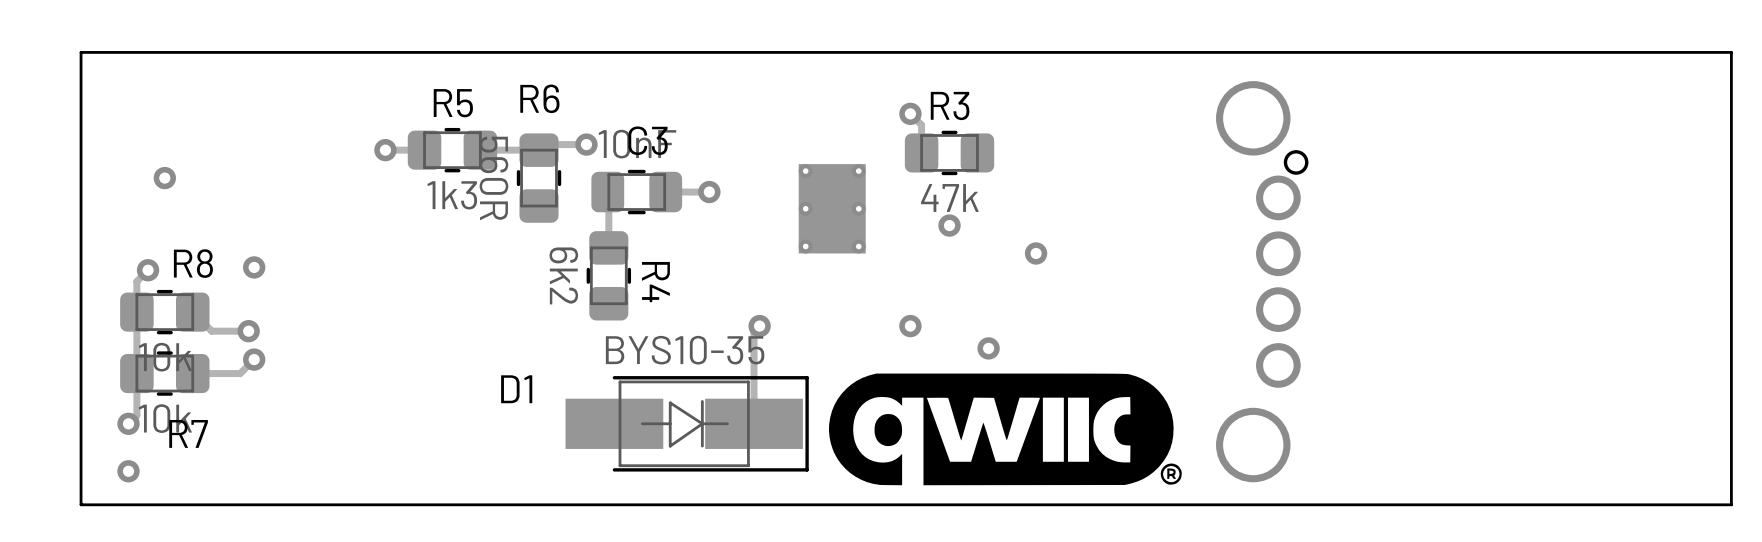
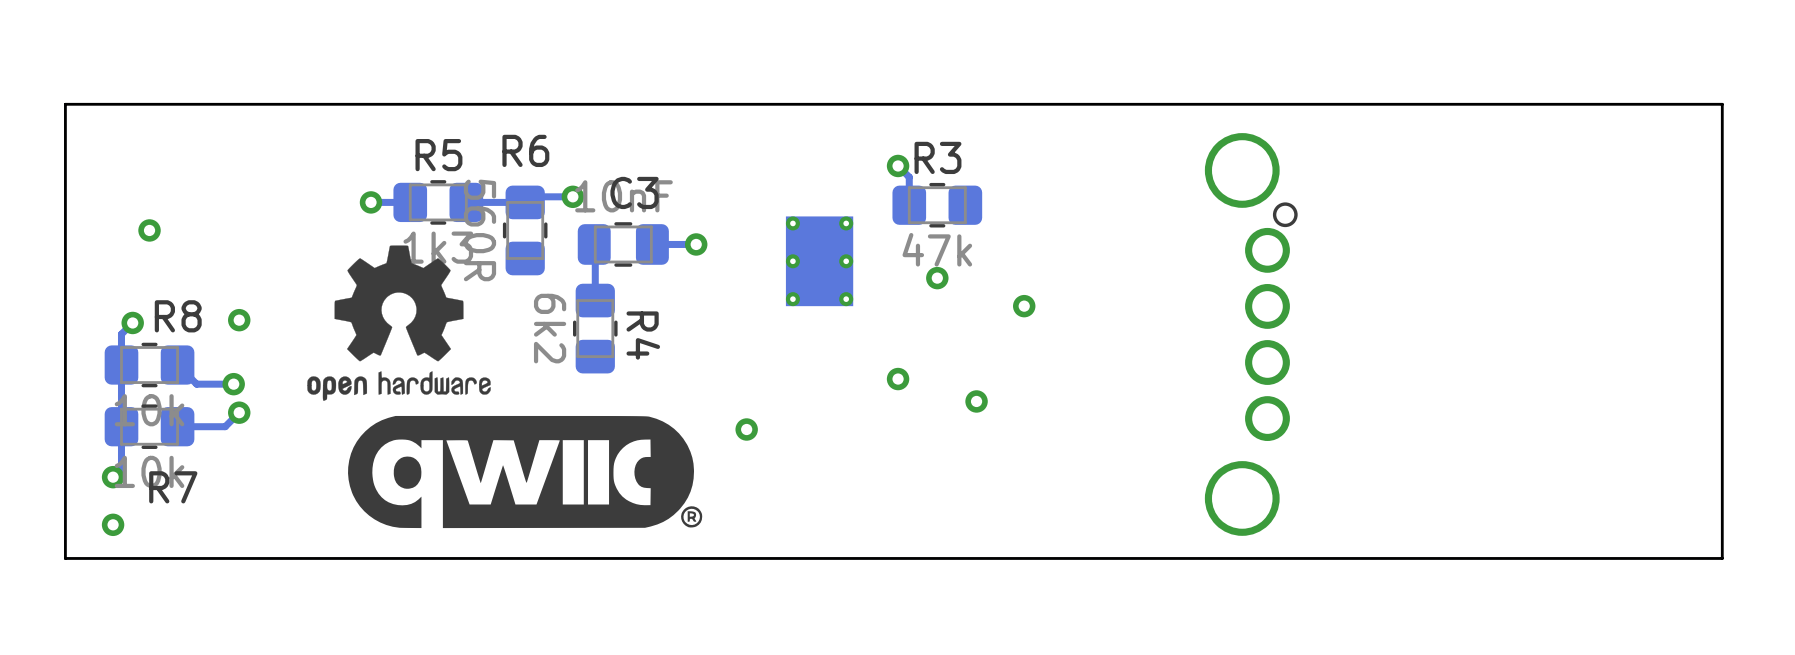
drawing: none -> [307, 245, 491, 401]
track: (759, 326) (754, 331) (754, 423) -> none
via position: (759, 326) -> (746, 429)
D1: BYS10-35 (687, 423) -> none
drawing position: (1005, 429) -> (525, 472)

